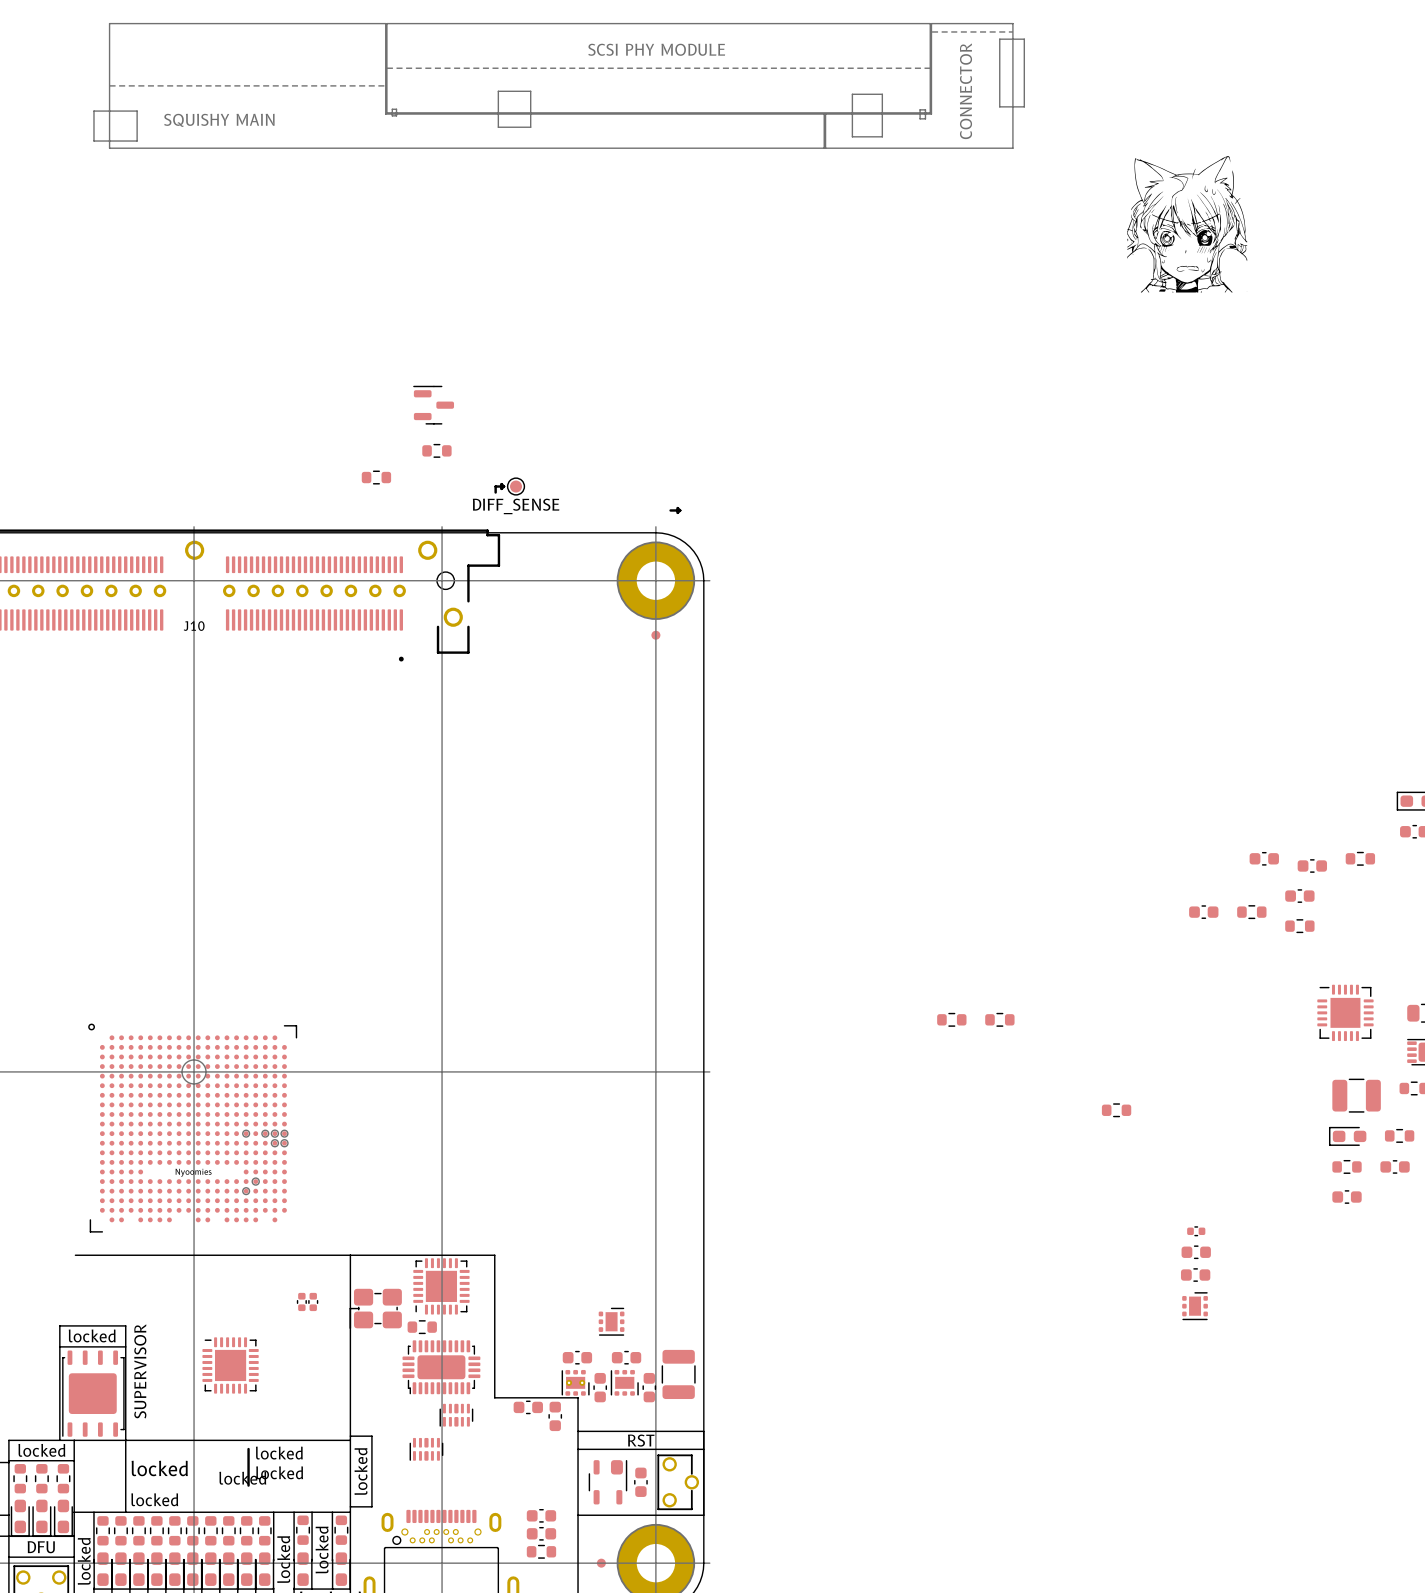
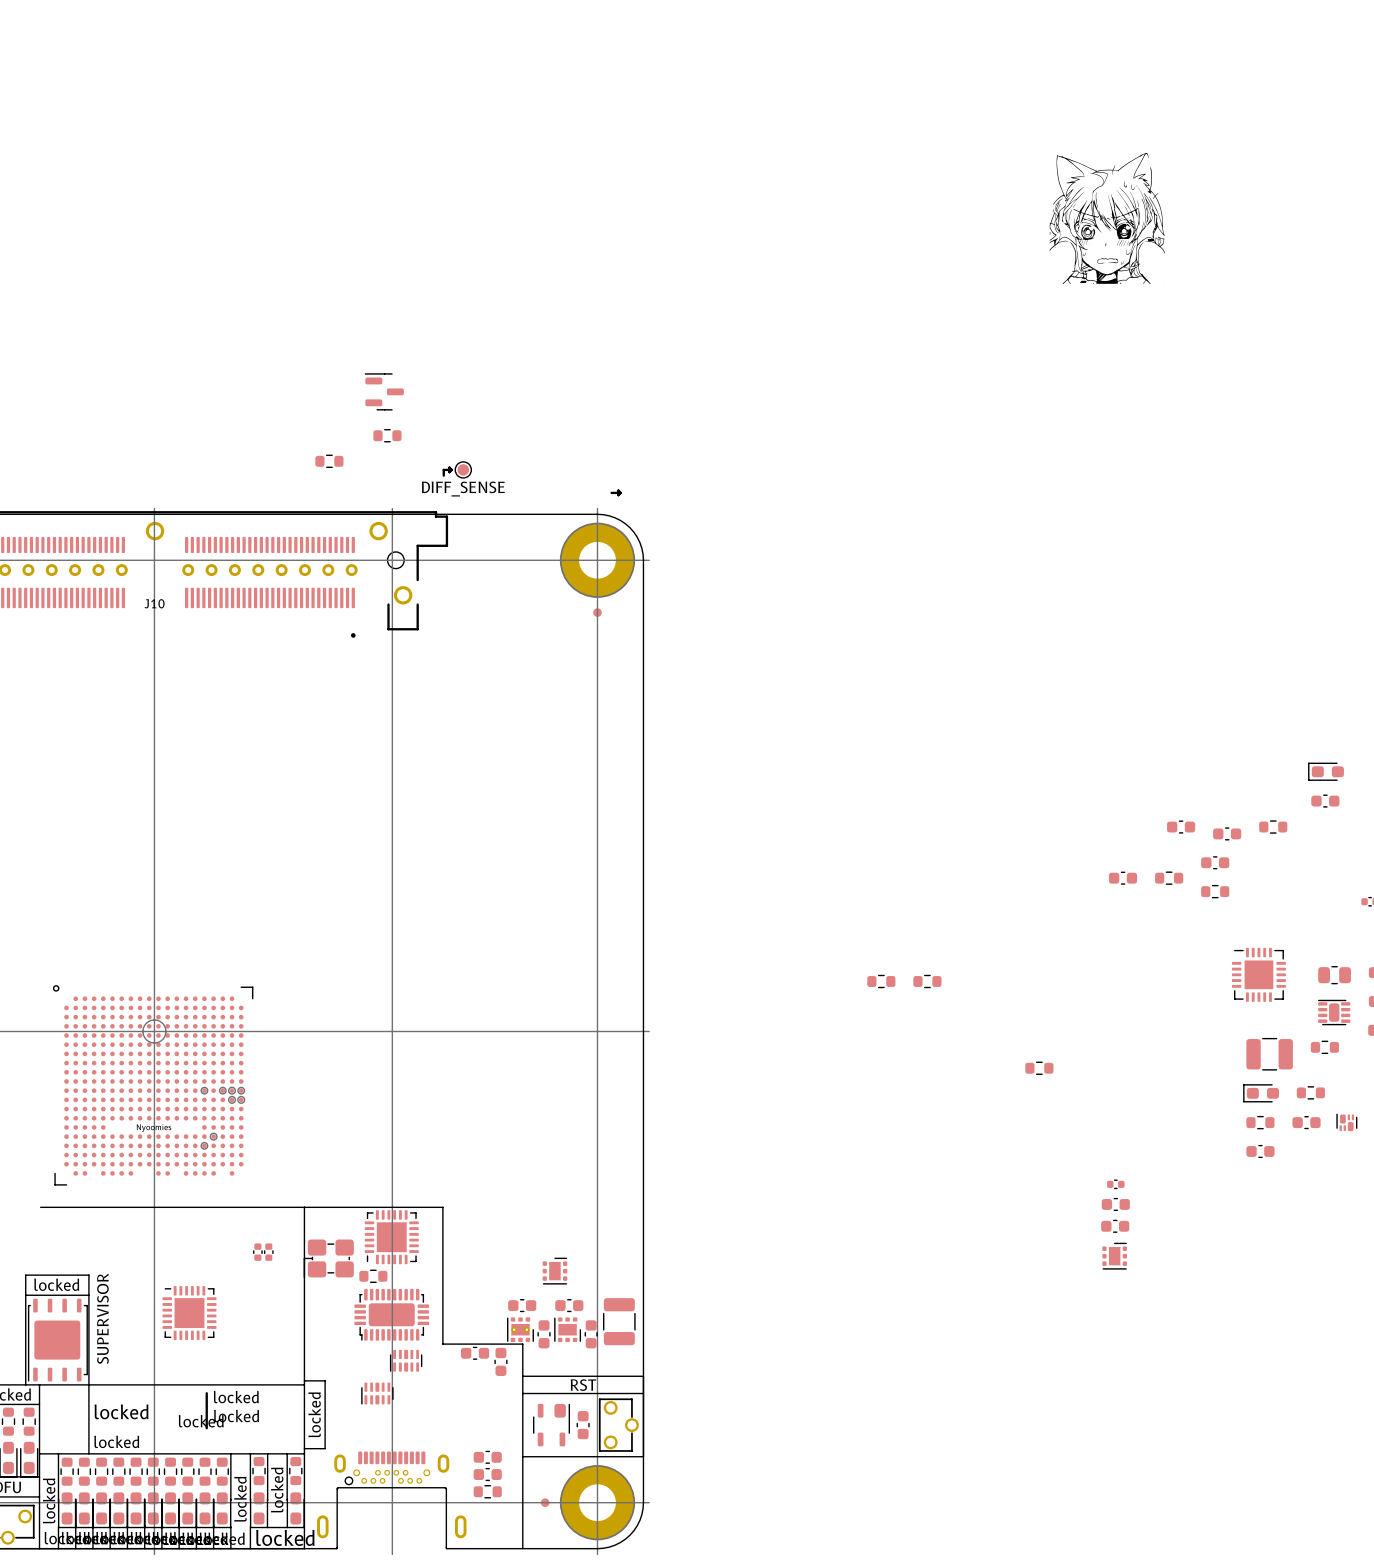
line: (109, 23) (109, 148) (824, 148) (824, 114) (385, 114) (385, 23) (109, 23) -> none
line: (386, 23) (386, 112) (930, 112) (930, 23) (386, 23) -> none
line: (931, 23) (1012, 23) (1012, 148) (825, 148) (825, 114) (931, 114) (931, 23) -> none
line: (932, 31) (1012, 31) -> none
line: (999, 39) (1024, 39) (1024, 106) (999, 106) (999, 39) -> none
text: SCSI PHY MODULE (656, 49) -> none
line: (386, 68) (930, 68) -> none
line: (109, 85) (385, 85) -> none
line: (498, 91) (530, 91) (530, 127) (498, 127) (498, 91) -> none
text: CONNECTOR (966, 91) -> none
line: (852, 94) (882, 94) (882, 136) (852, 136) (852, 94) -> none
line: (392, 109) (396, 109) (396, 115) (392, 115) (392, 109) -> none
line: (920, 109) (925, 109) (925, 118) (920, 118) (920, 109) -> none
line: (93, 111) (137, 111) (137, 141) (93, 141) (93, 111) -> none
text: SQUISHY MAIN (219, 120) -> none

